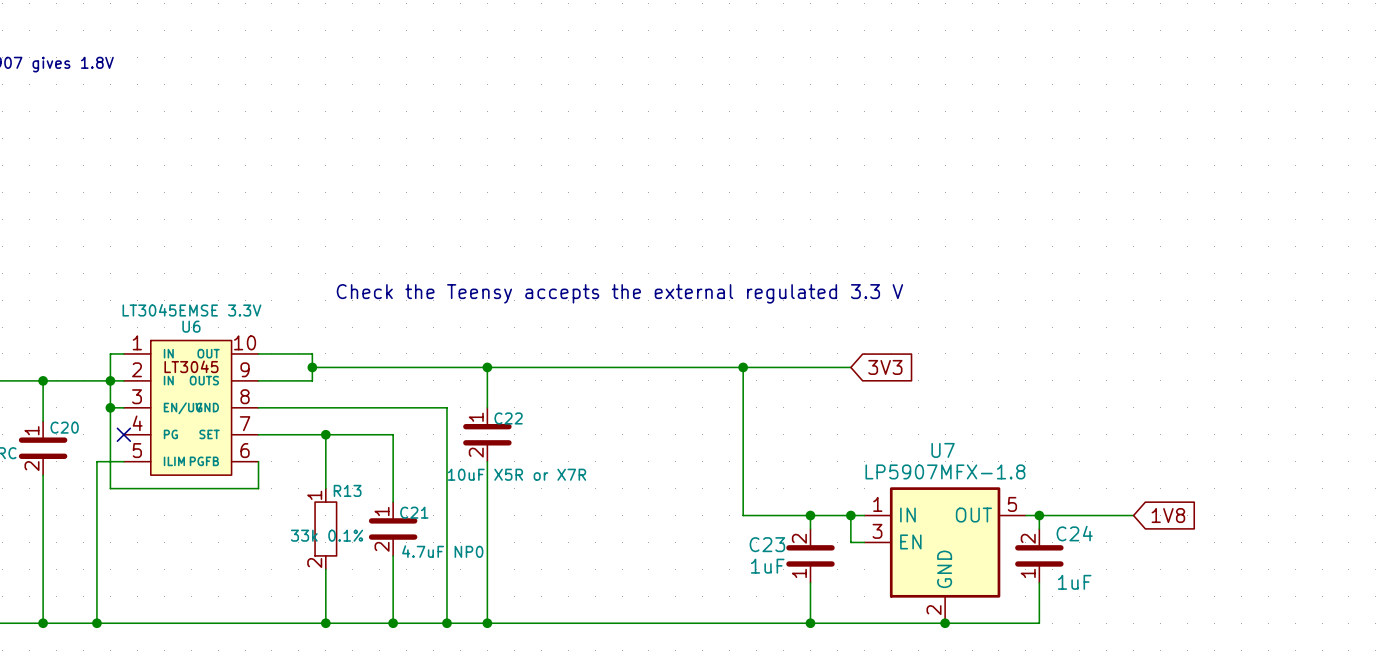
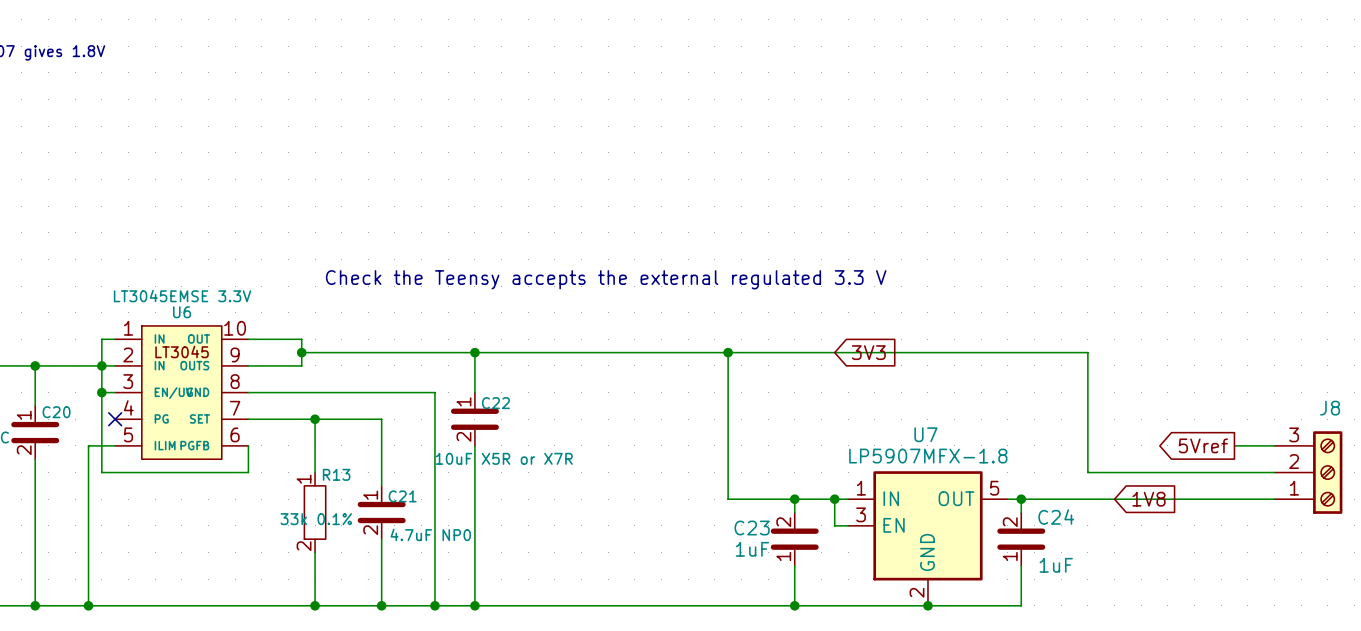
wire: none -> (834, 352) (1087, 352) (1087, 472) (1274, 472)
global label: none -> 5Vref (1203, 445)
wire: none -> (1234, 445) (1274, 445)
J8: none -> (1308, 472)
wire: none -> (1114, 499) (1274, 499)

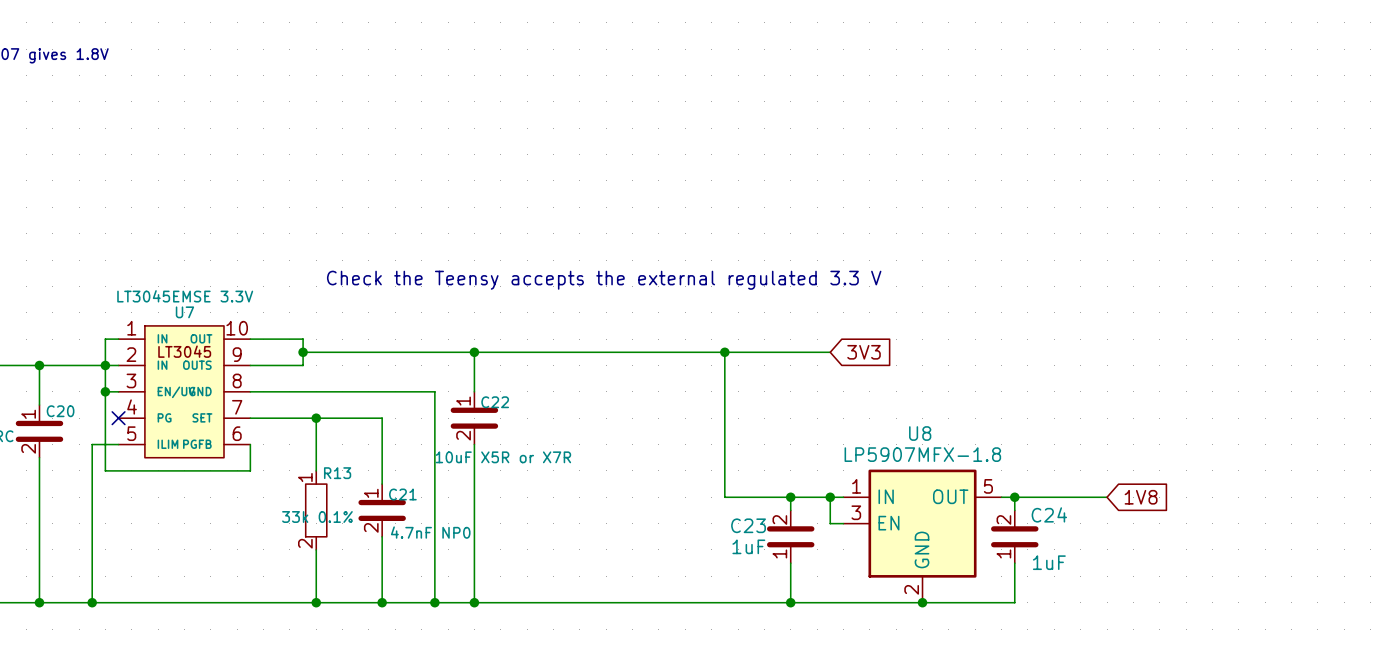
U6 name: U6 (182, 312) -> U7 (184, 312)
wire: (834, 352) (1087, 352) (1087, 472) (1274, 472) -> none
U7 name: U7 (925, 434) -> U8 (920, 433)
global label: 5Vref (1203, 445) -> none
wire: (1234, 445) (1274, 445) -> none
J8: (1308, 472) -> none
wire: (1114, 499) (1274, 499) -> none
C21 value: 4.7uF NP0 (430, 534) -> 4.7nF NP0 (430, 532)

